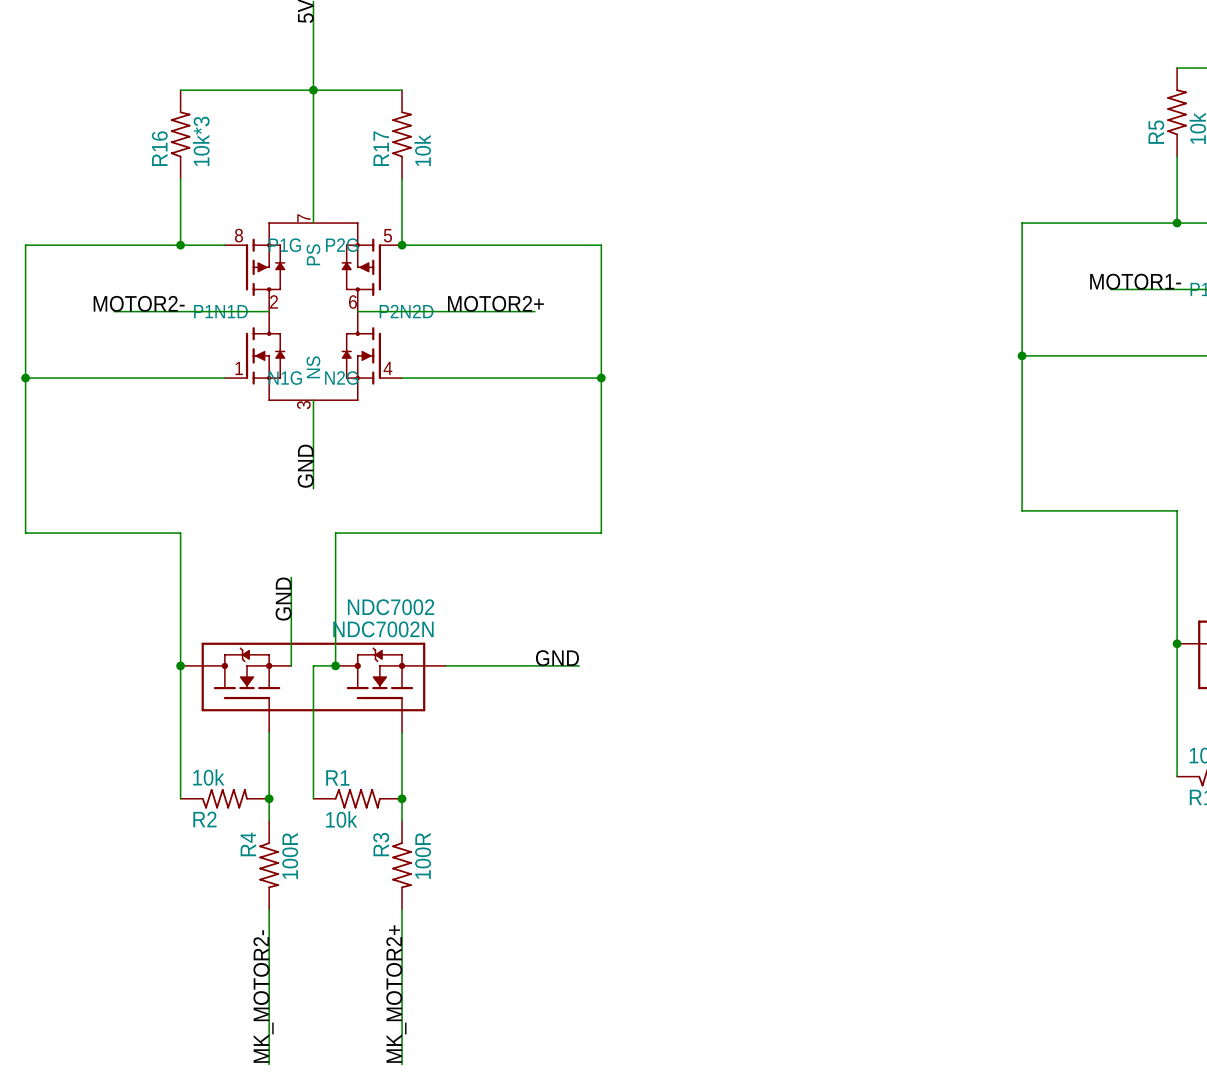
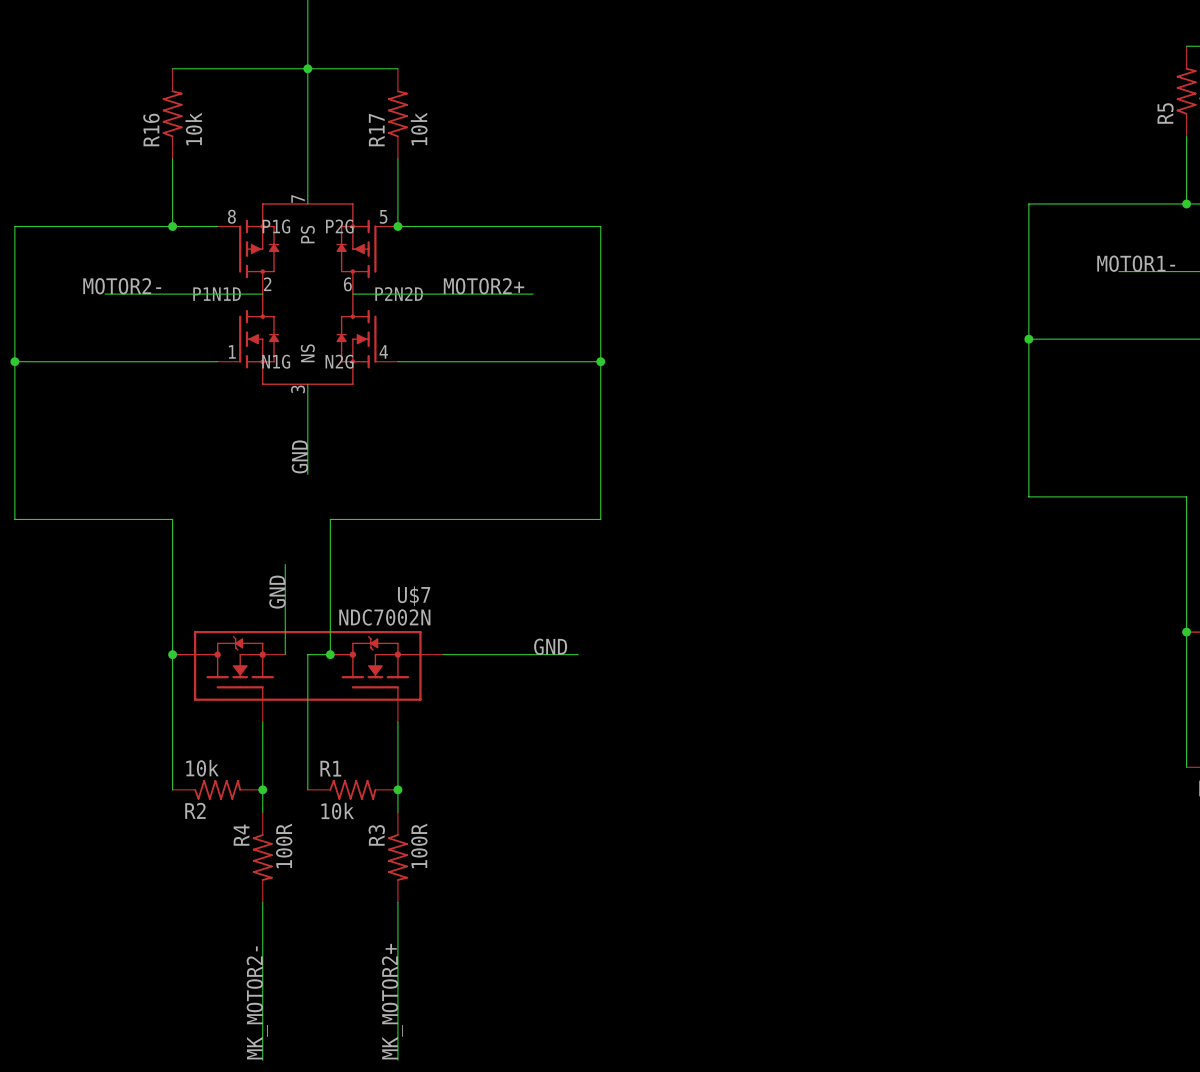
R16 value: 10k*3 (201, 141) -> 10k (193, 129)
NDC7002 name: NDC7002 (391, 607) -> U$7 (414, 596)

